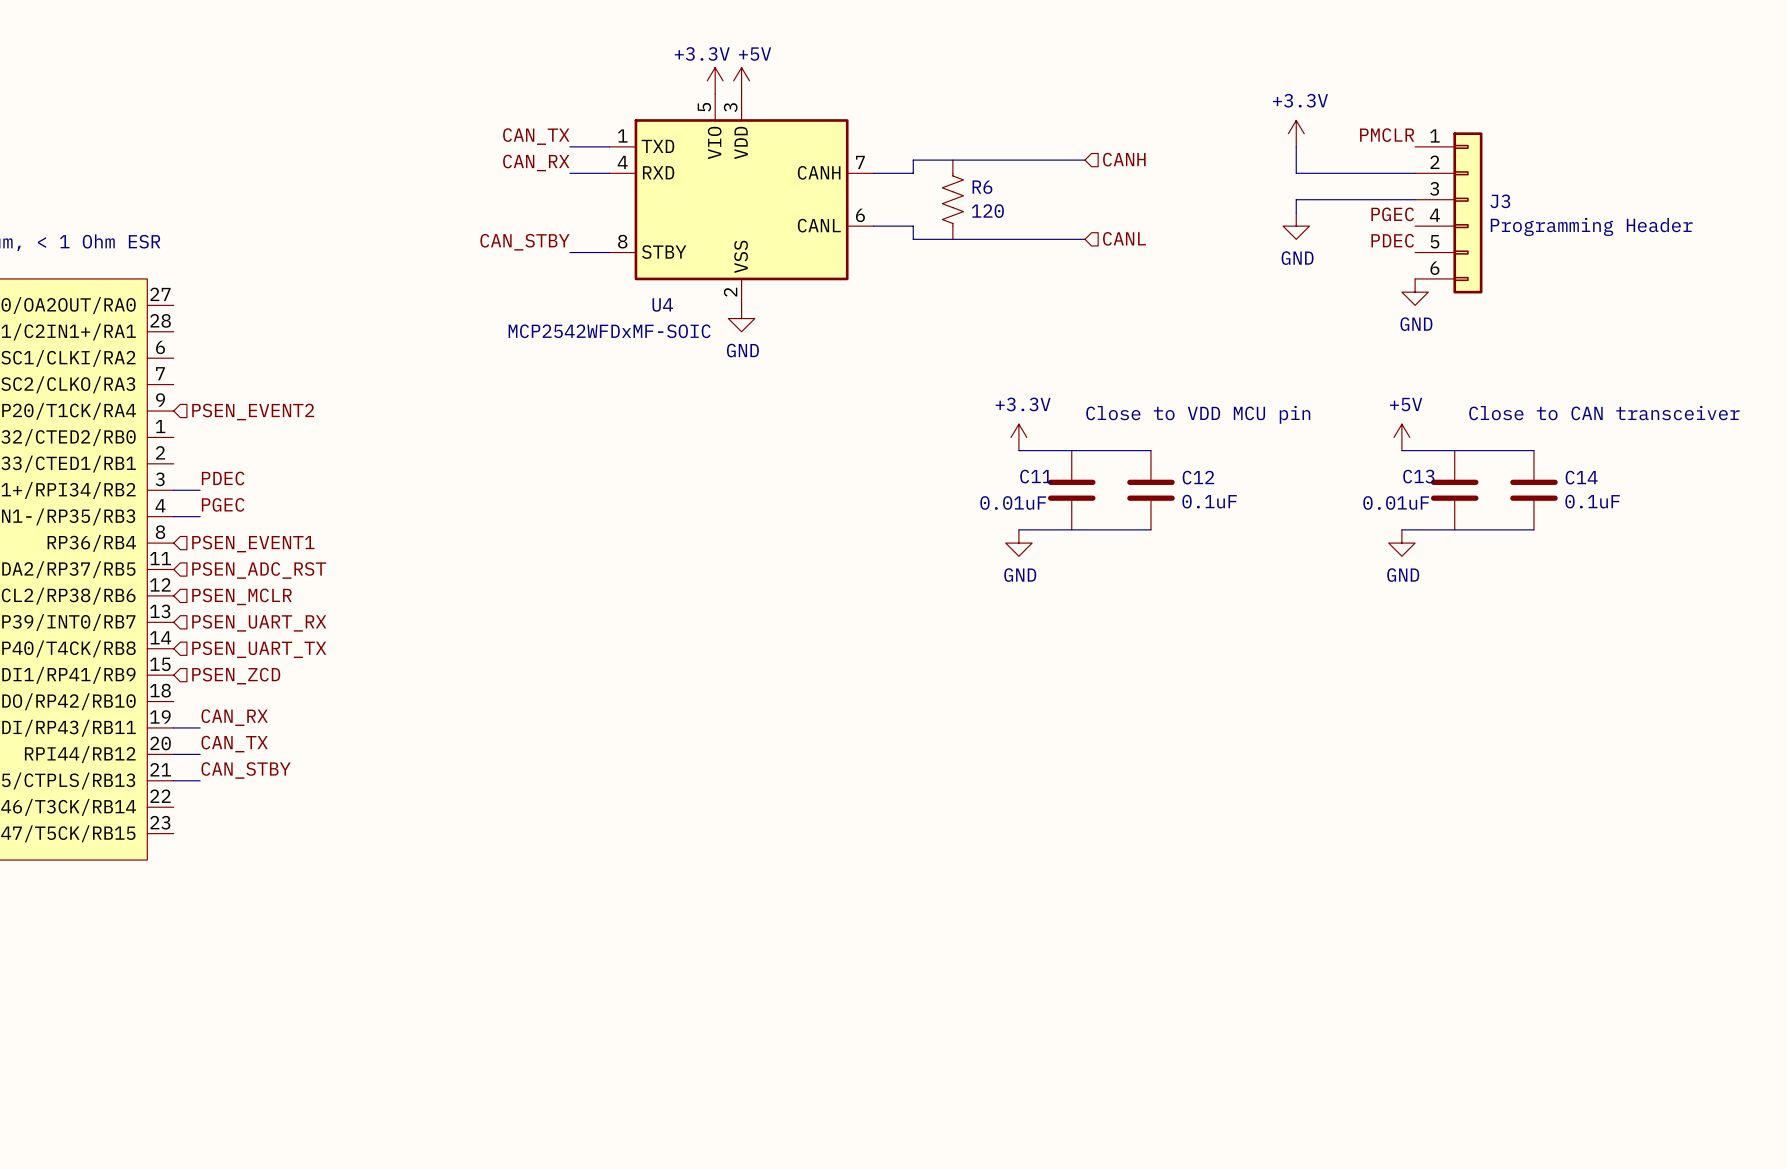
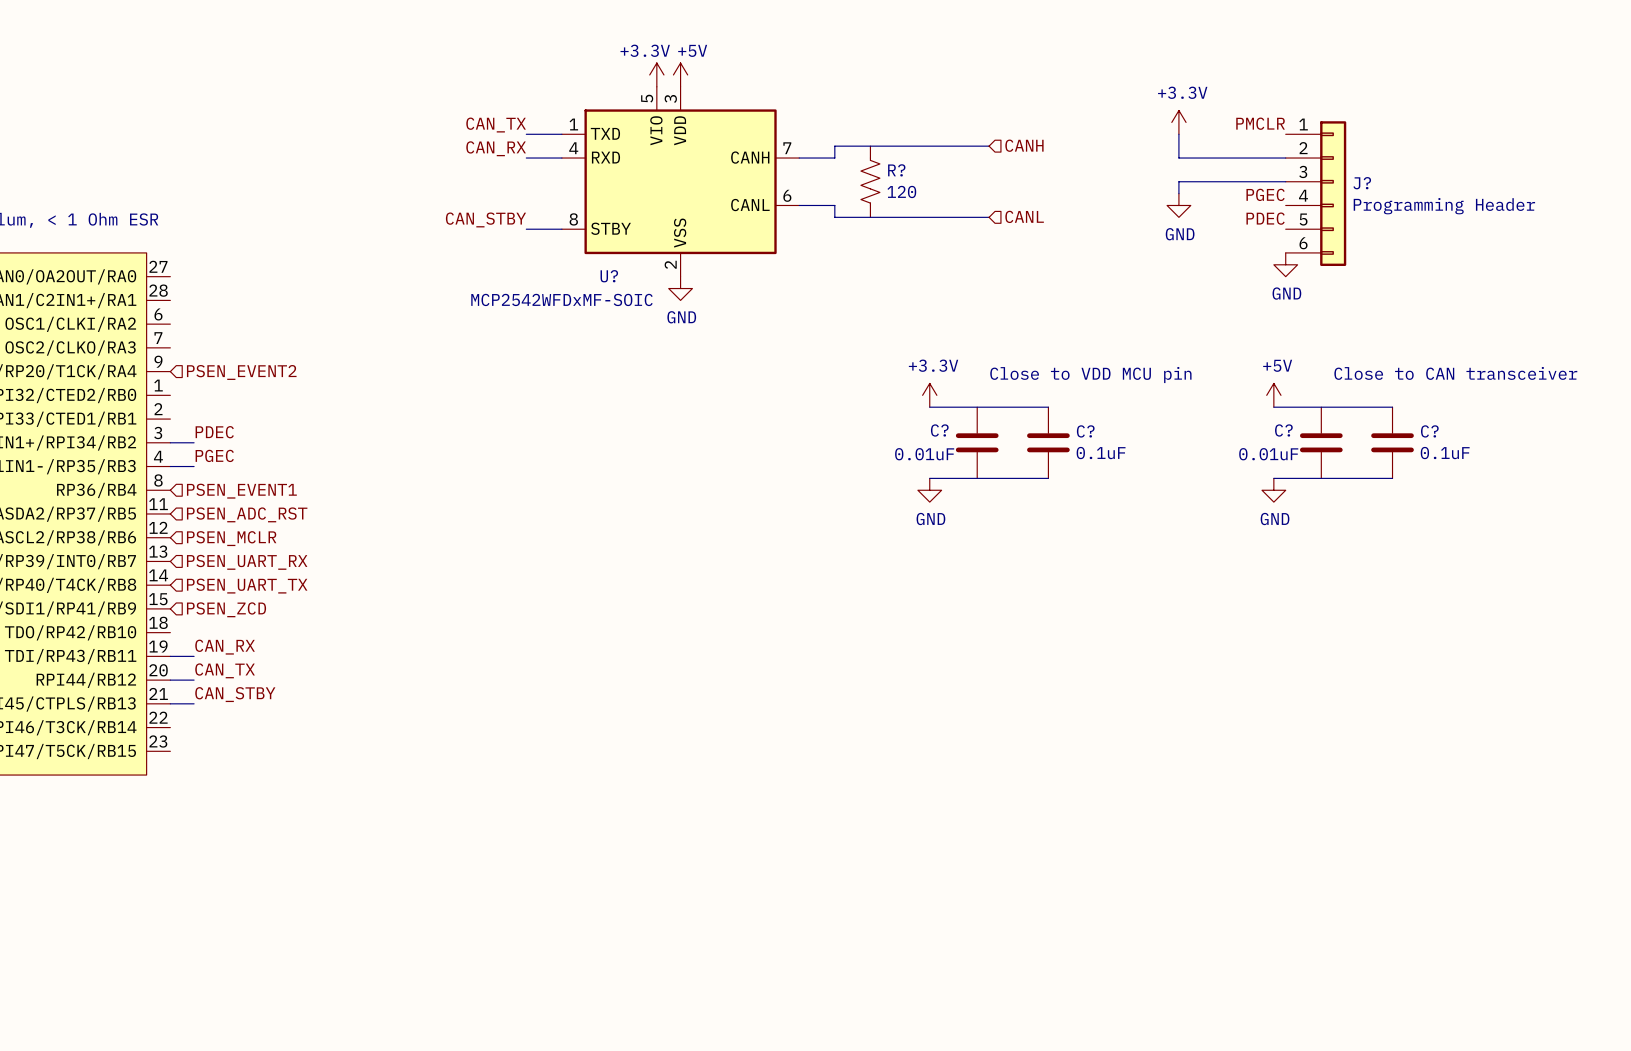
R6 name: R6 (982, 187) -> R? (896, 170)
J3 name: J3 (1500, 201) -> J? (1362, 183)
U4 name: U4 (662, 304) -> U? (609, 276)
C11 name: C11 (1036, 476) -> C? (939, 430)
C13 name: C13 (1418, 476) -> C? (1283, 430)
C12 name: C12 (1198, 477) -> C? (1085, 431)
C14 name: C14 (1581, 477) -> C? (1429, 431)

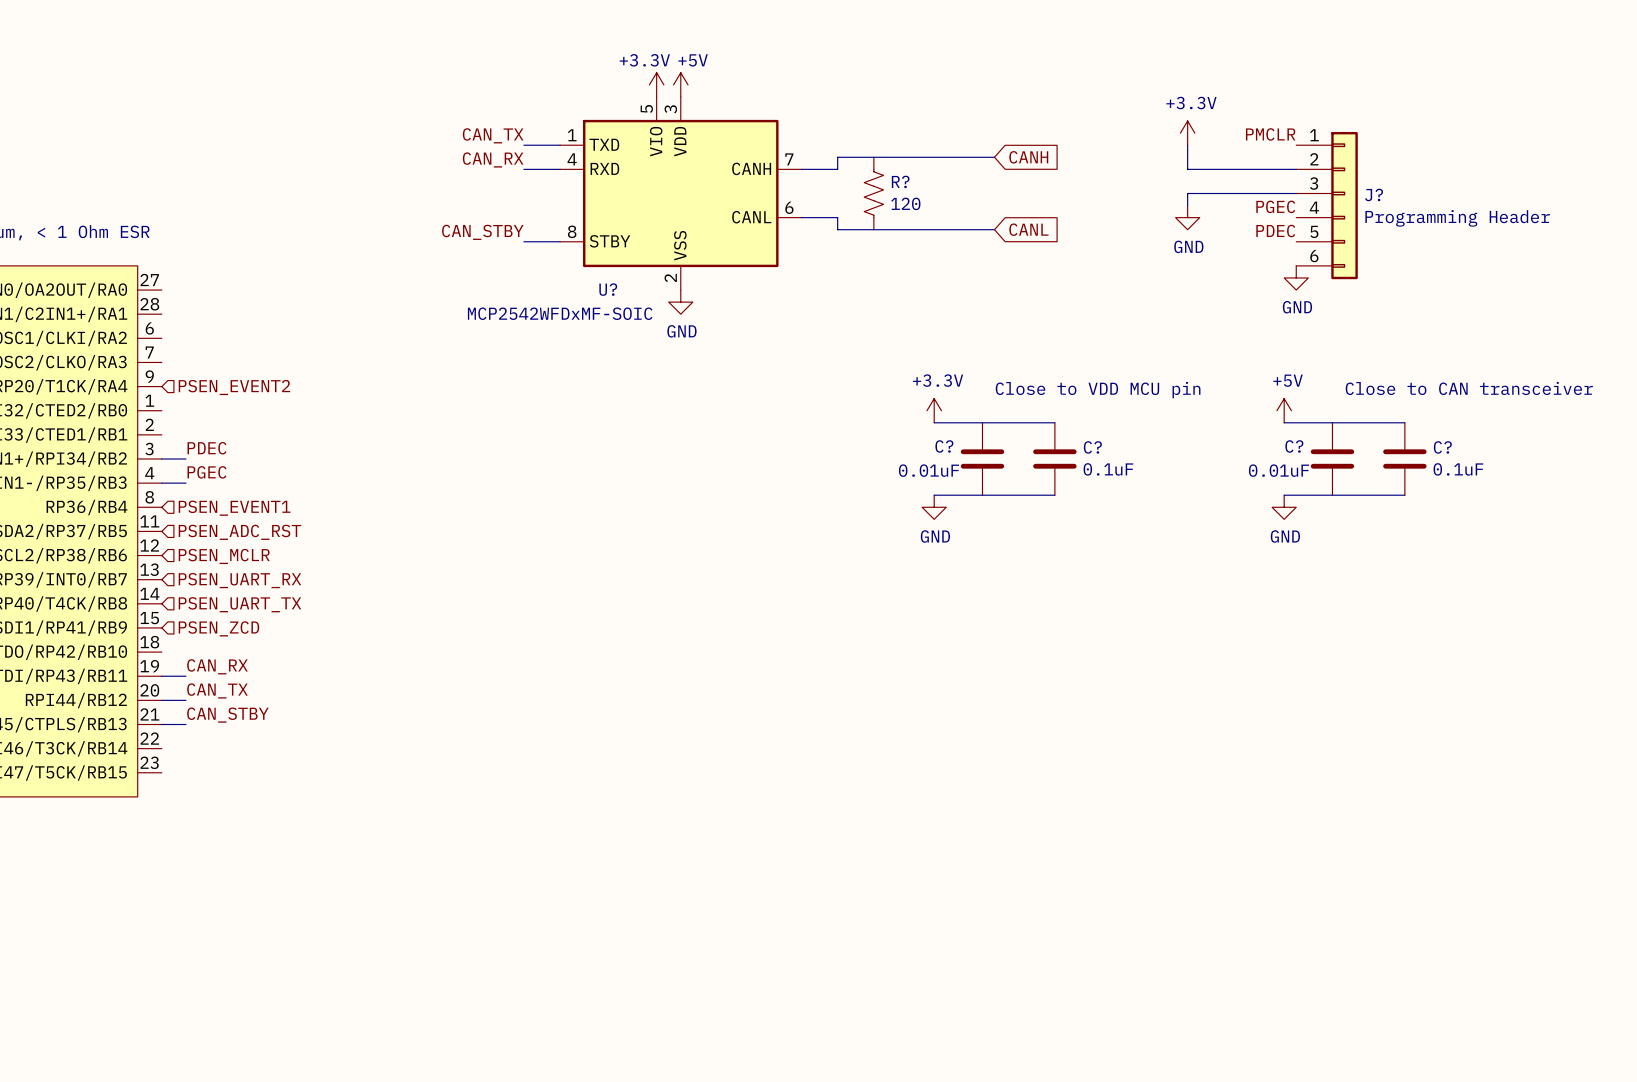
hierarchical label: CANH (1024, 145) -> none
global label: none -> CANH (1028, 157)
hierarchical label: CANL (1024, 216) -> none
global label: none -> CANL (1028, 229)

